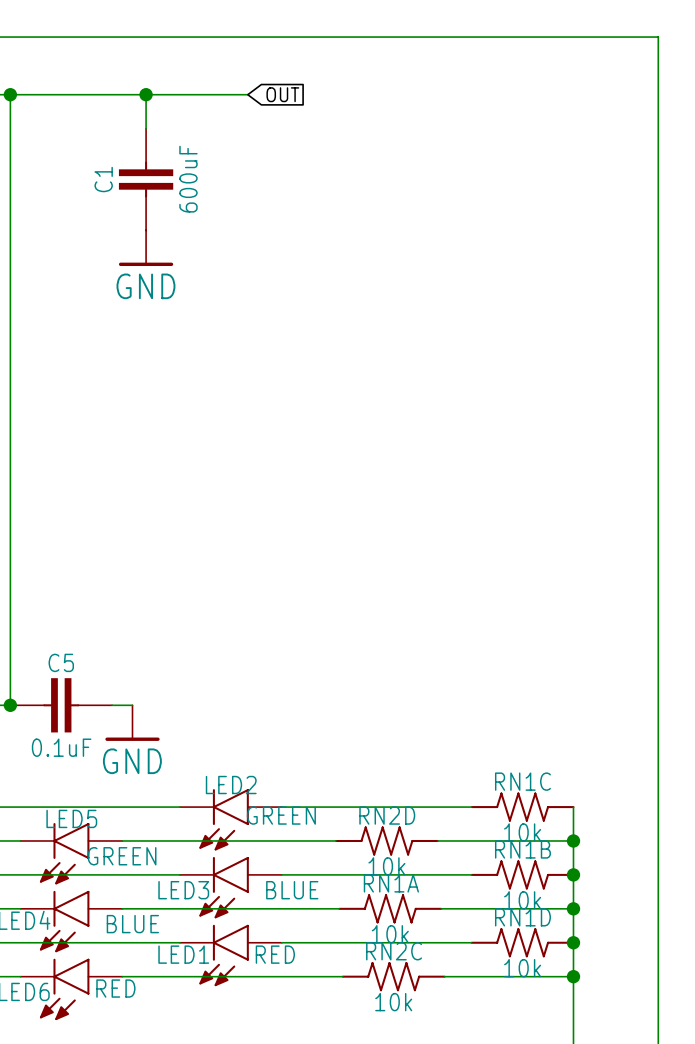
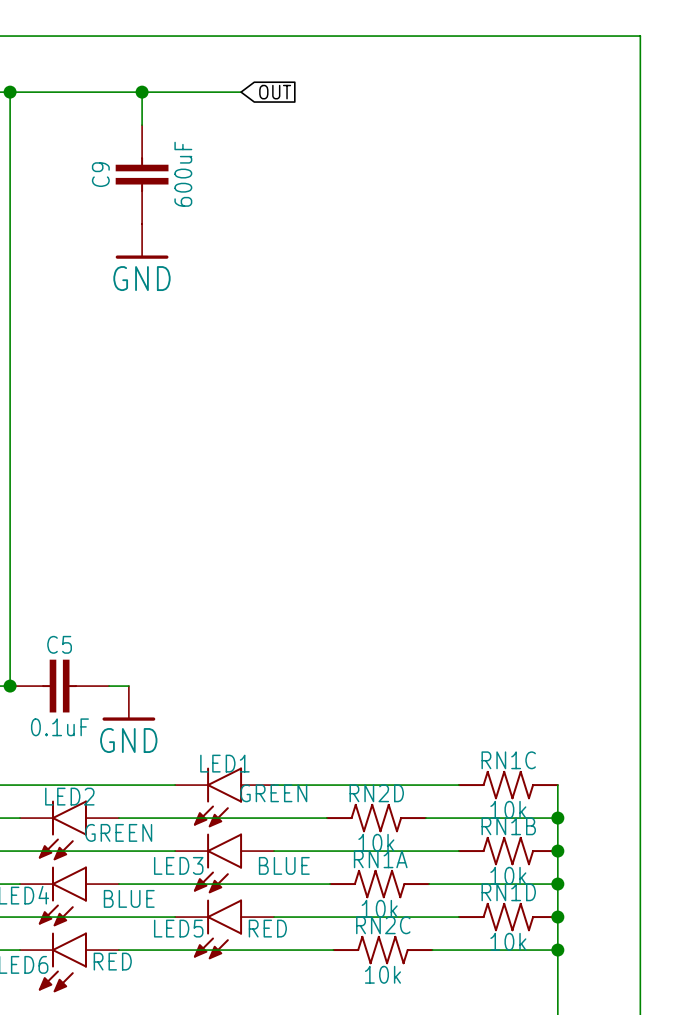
C1 name: C1 (103, 179) -> C9 (100, 174)
LED2 name: LED2 (231, 785) -> LED1 (224, 763)
LED5 name: LED5 (71, 818) -> LED2 (69, 796)
LED1 name: LED1 (183, 954) -> LED5 (178, 928)

